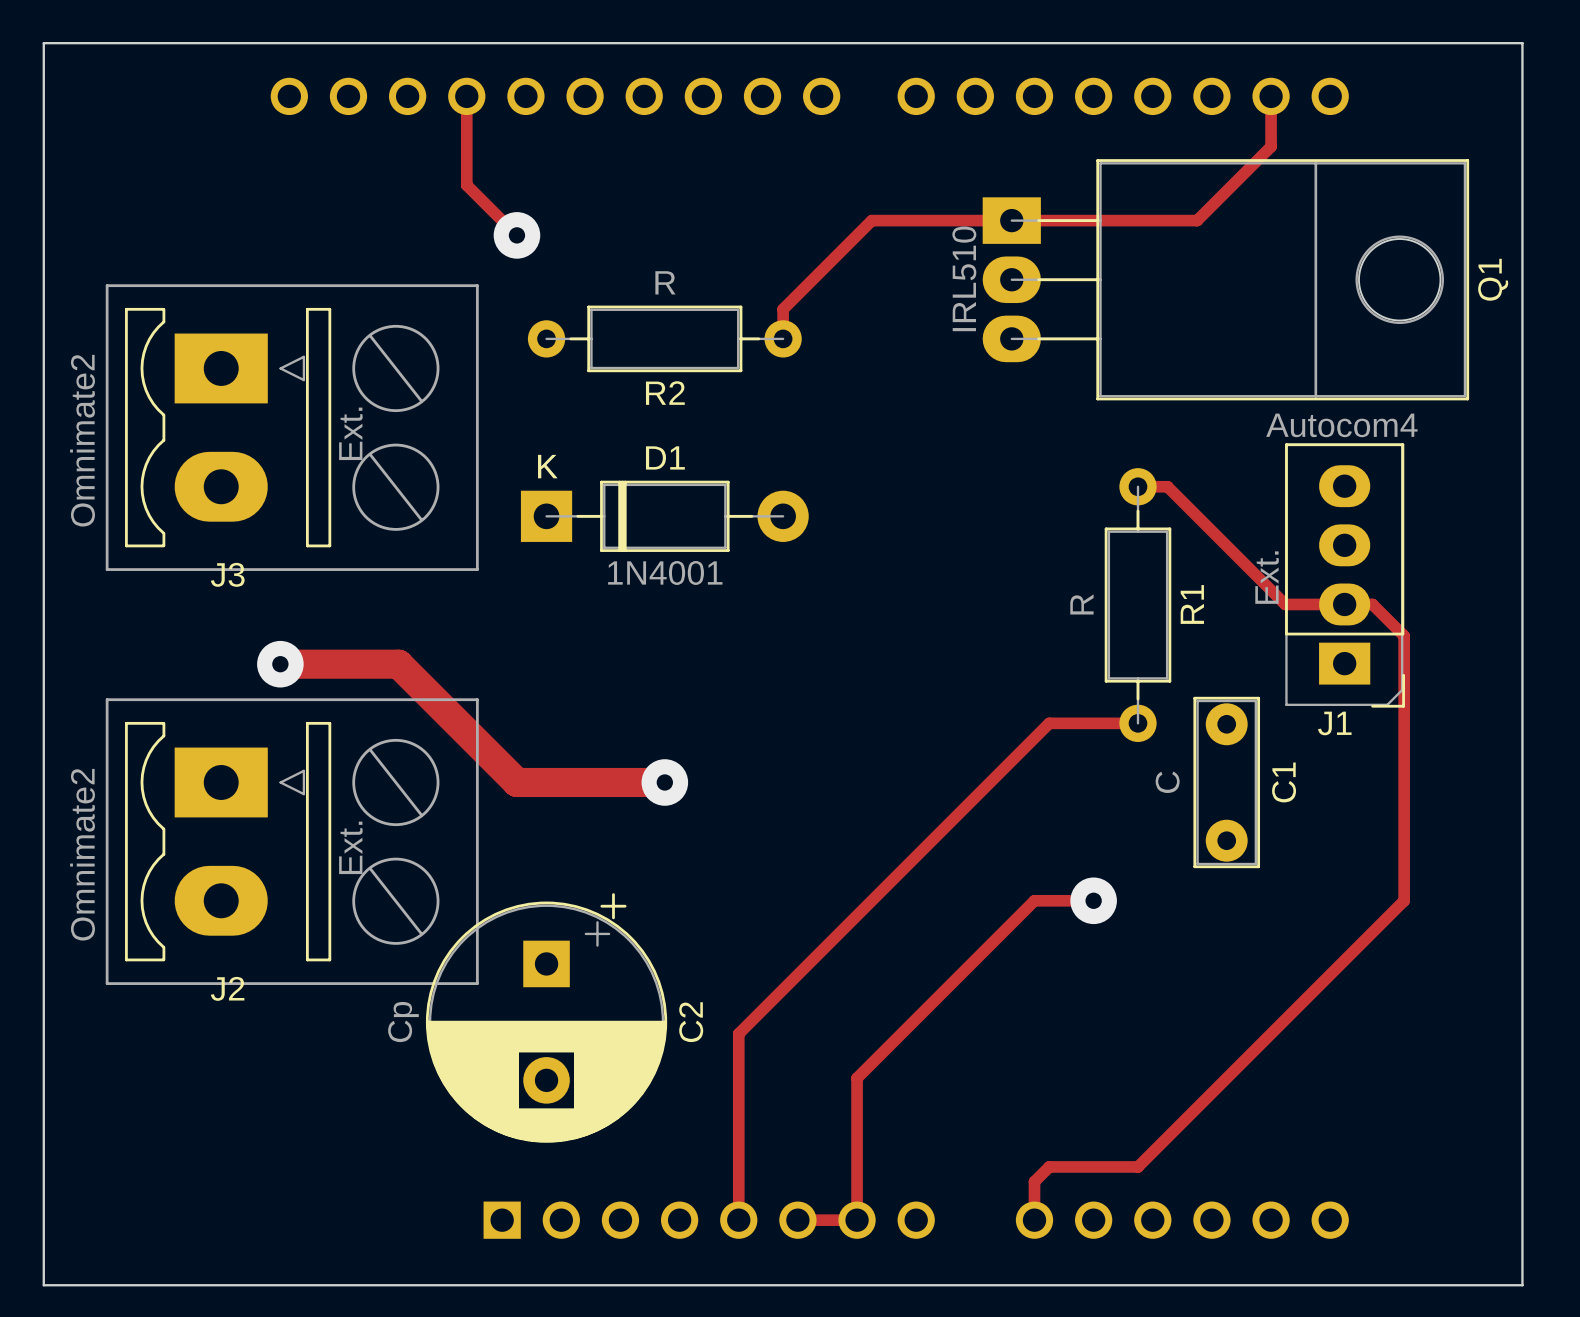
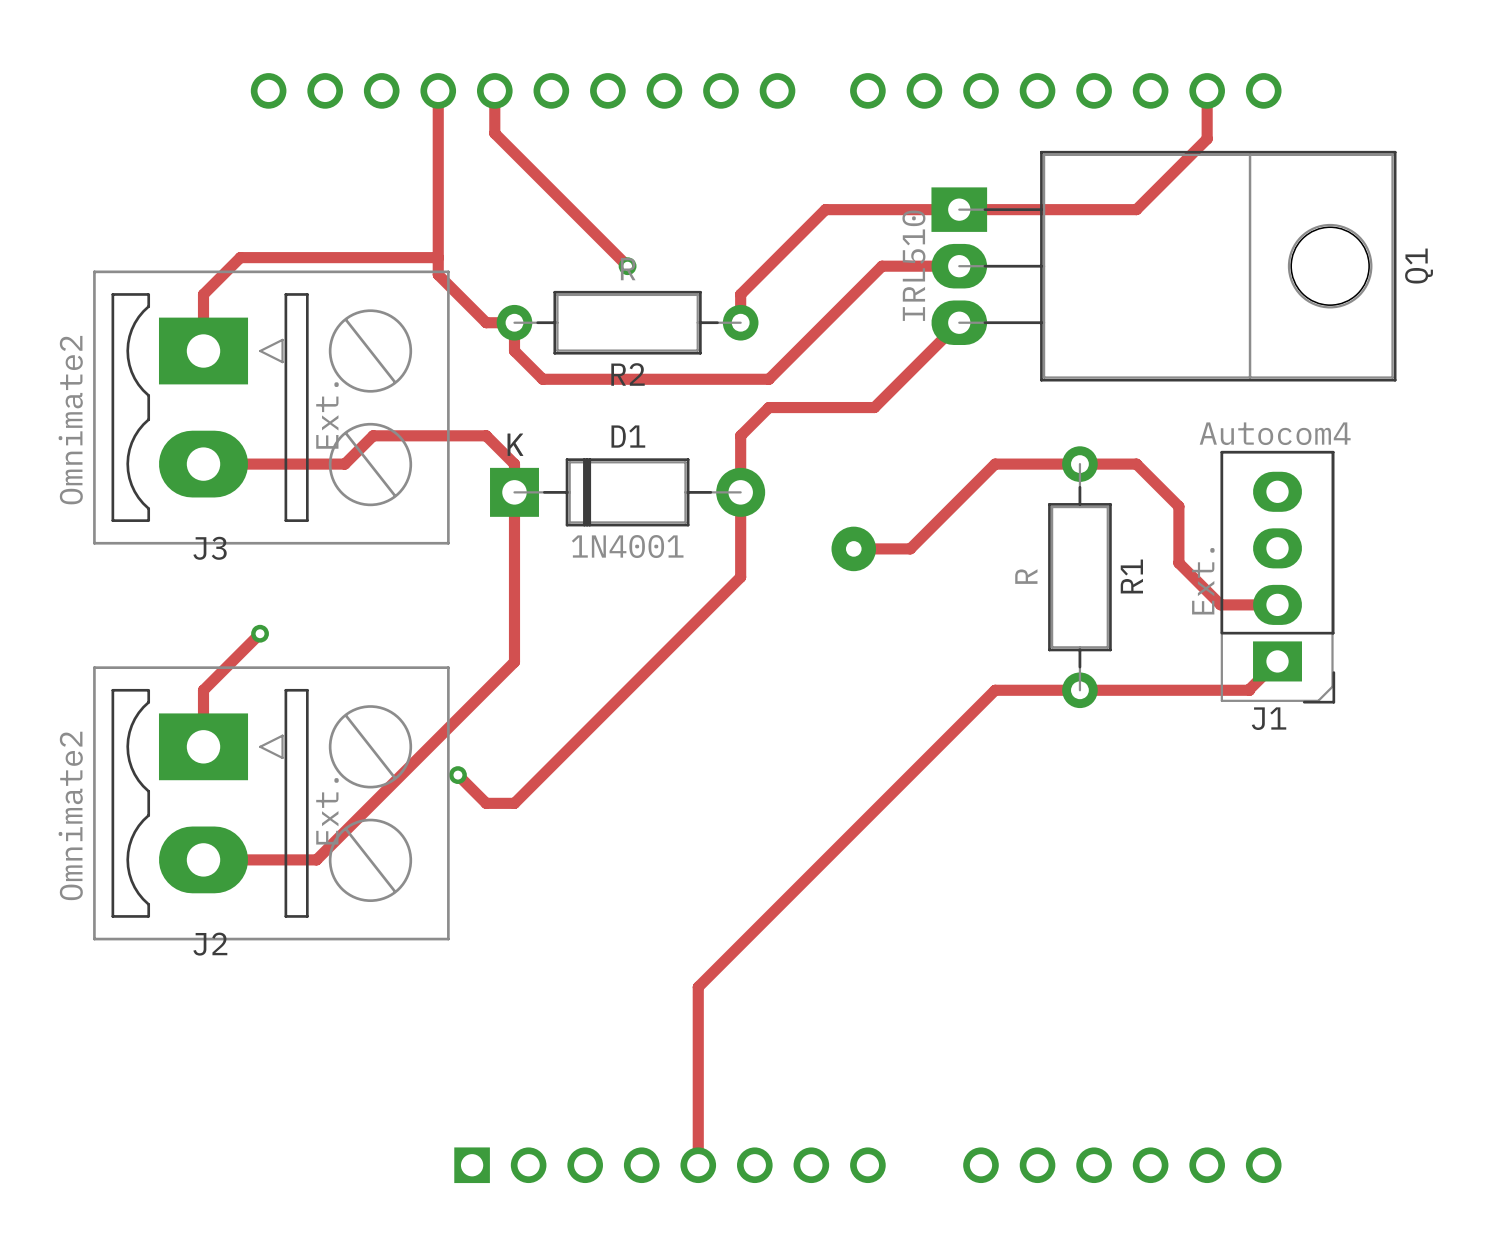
board edge: (43, 43) (43, 1285) (1522, 1285) (1522, 43) (43, 43) -> none
track: none -> (494, 96) (494, 133) (627, 266)
track: (466, 185) (516, 235) -> (438, 175) (438, 274) (486, 322) (514, 322) (514, 351) (542, 379) (768, 379) (882, 266) (959, 266)
via: (516, 235) -> none
track: none -> (438, 257) (240, 257) (203, 294) (203, 351)
via: none -> (627, 266)
track: none -> (959, 322) (874, 407) (768, 407) (740, 435) (740, 577) (514, 803) (486, 803) (457, 775)
track: none -> (203, 464) (344, 464) (373, 435) (486, 435) (514, 464) (514, 662) (316, 859) (203, 859)
track: none -> (1079, 464) (995, 464) (910, 548) (853, 548)
track: (1167, 486) (1285, 604) (1372, 604) (1404, 636) (1404, 900) (1138, 1166) (1049, 1166) (1034, 1181) (1034, 1220) -> (1108, 464) (1136, 464) (1178, 506) (1178, 563) (1220, 604) (1277, 604)
via: none -> (853, 548)
J1 position: (1345, 575) -> (1277, 577)
via size: [257, 640, 304, 688] -> [251, 624, 269, 643]
track: (280, 664) (398, 664) (516, 782) (664, 782) -> (260, 633) (203, 690) (203, 746)
track: none -> (1277, 661) (1249, 690) (1079, 690)
via: (664, 782) -> none
C1: C (1226, 782) -> none
via: none -> (457, 775)
track: (1093, 900) (1034, 900) (857, 1078) (857, 1220) (797, 1220) -> none
via: (1093, 900) -> none
C2: Cp (546, 1017) -> none

